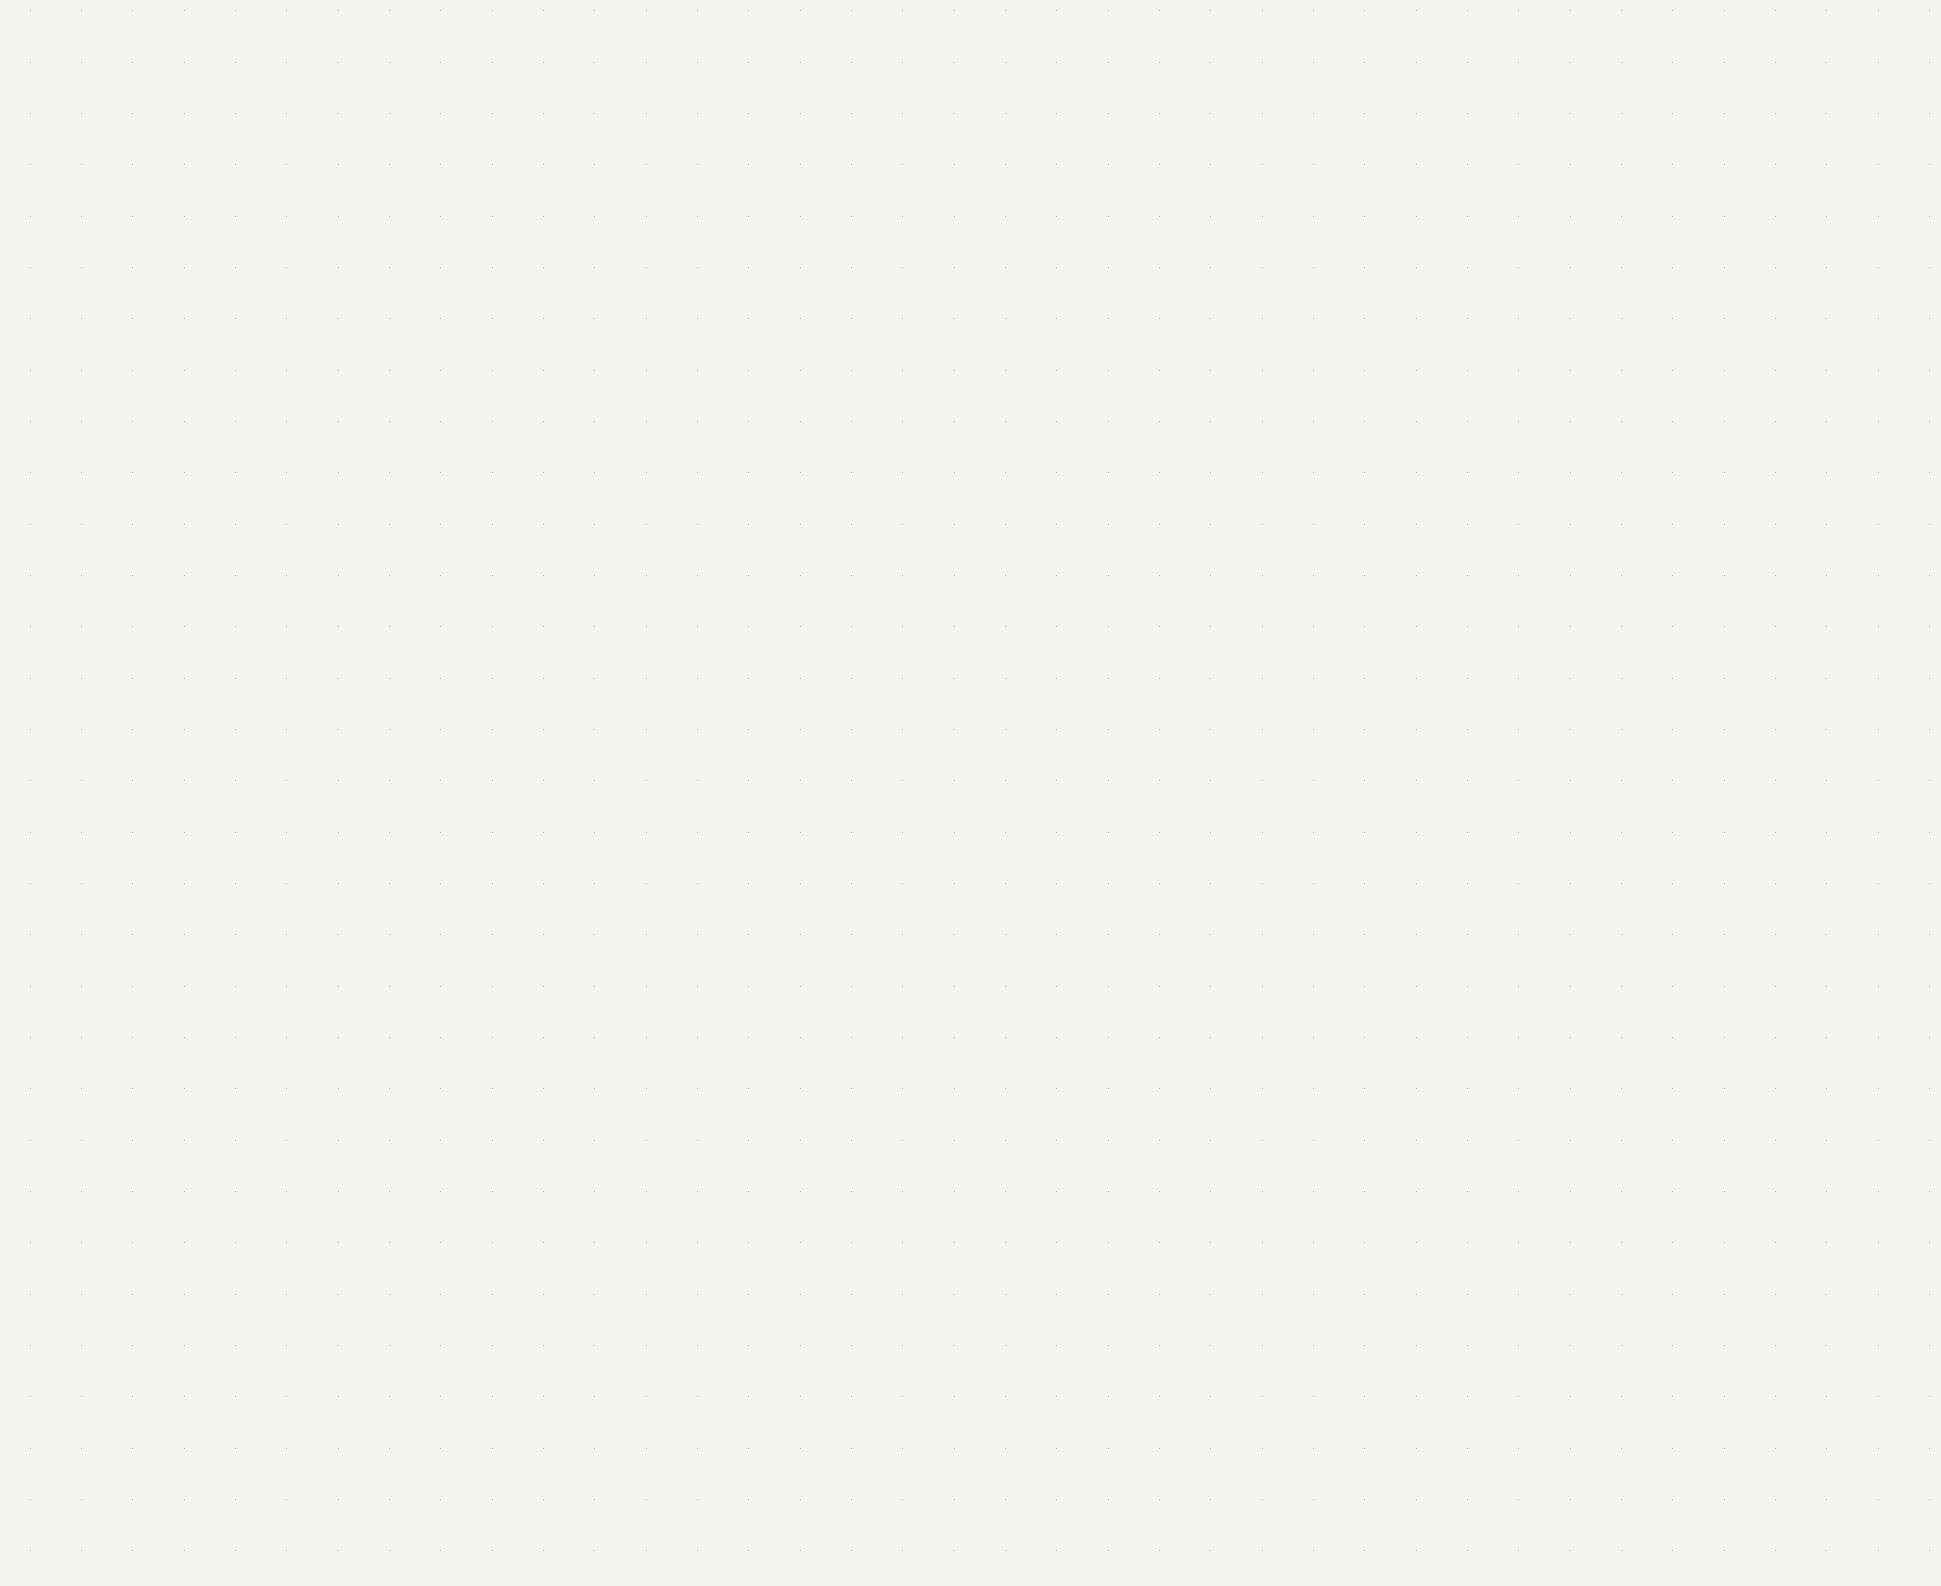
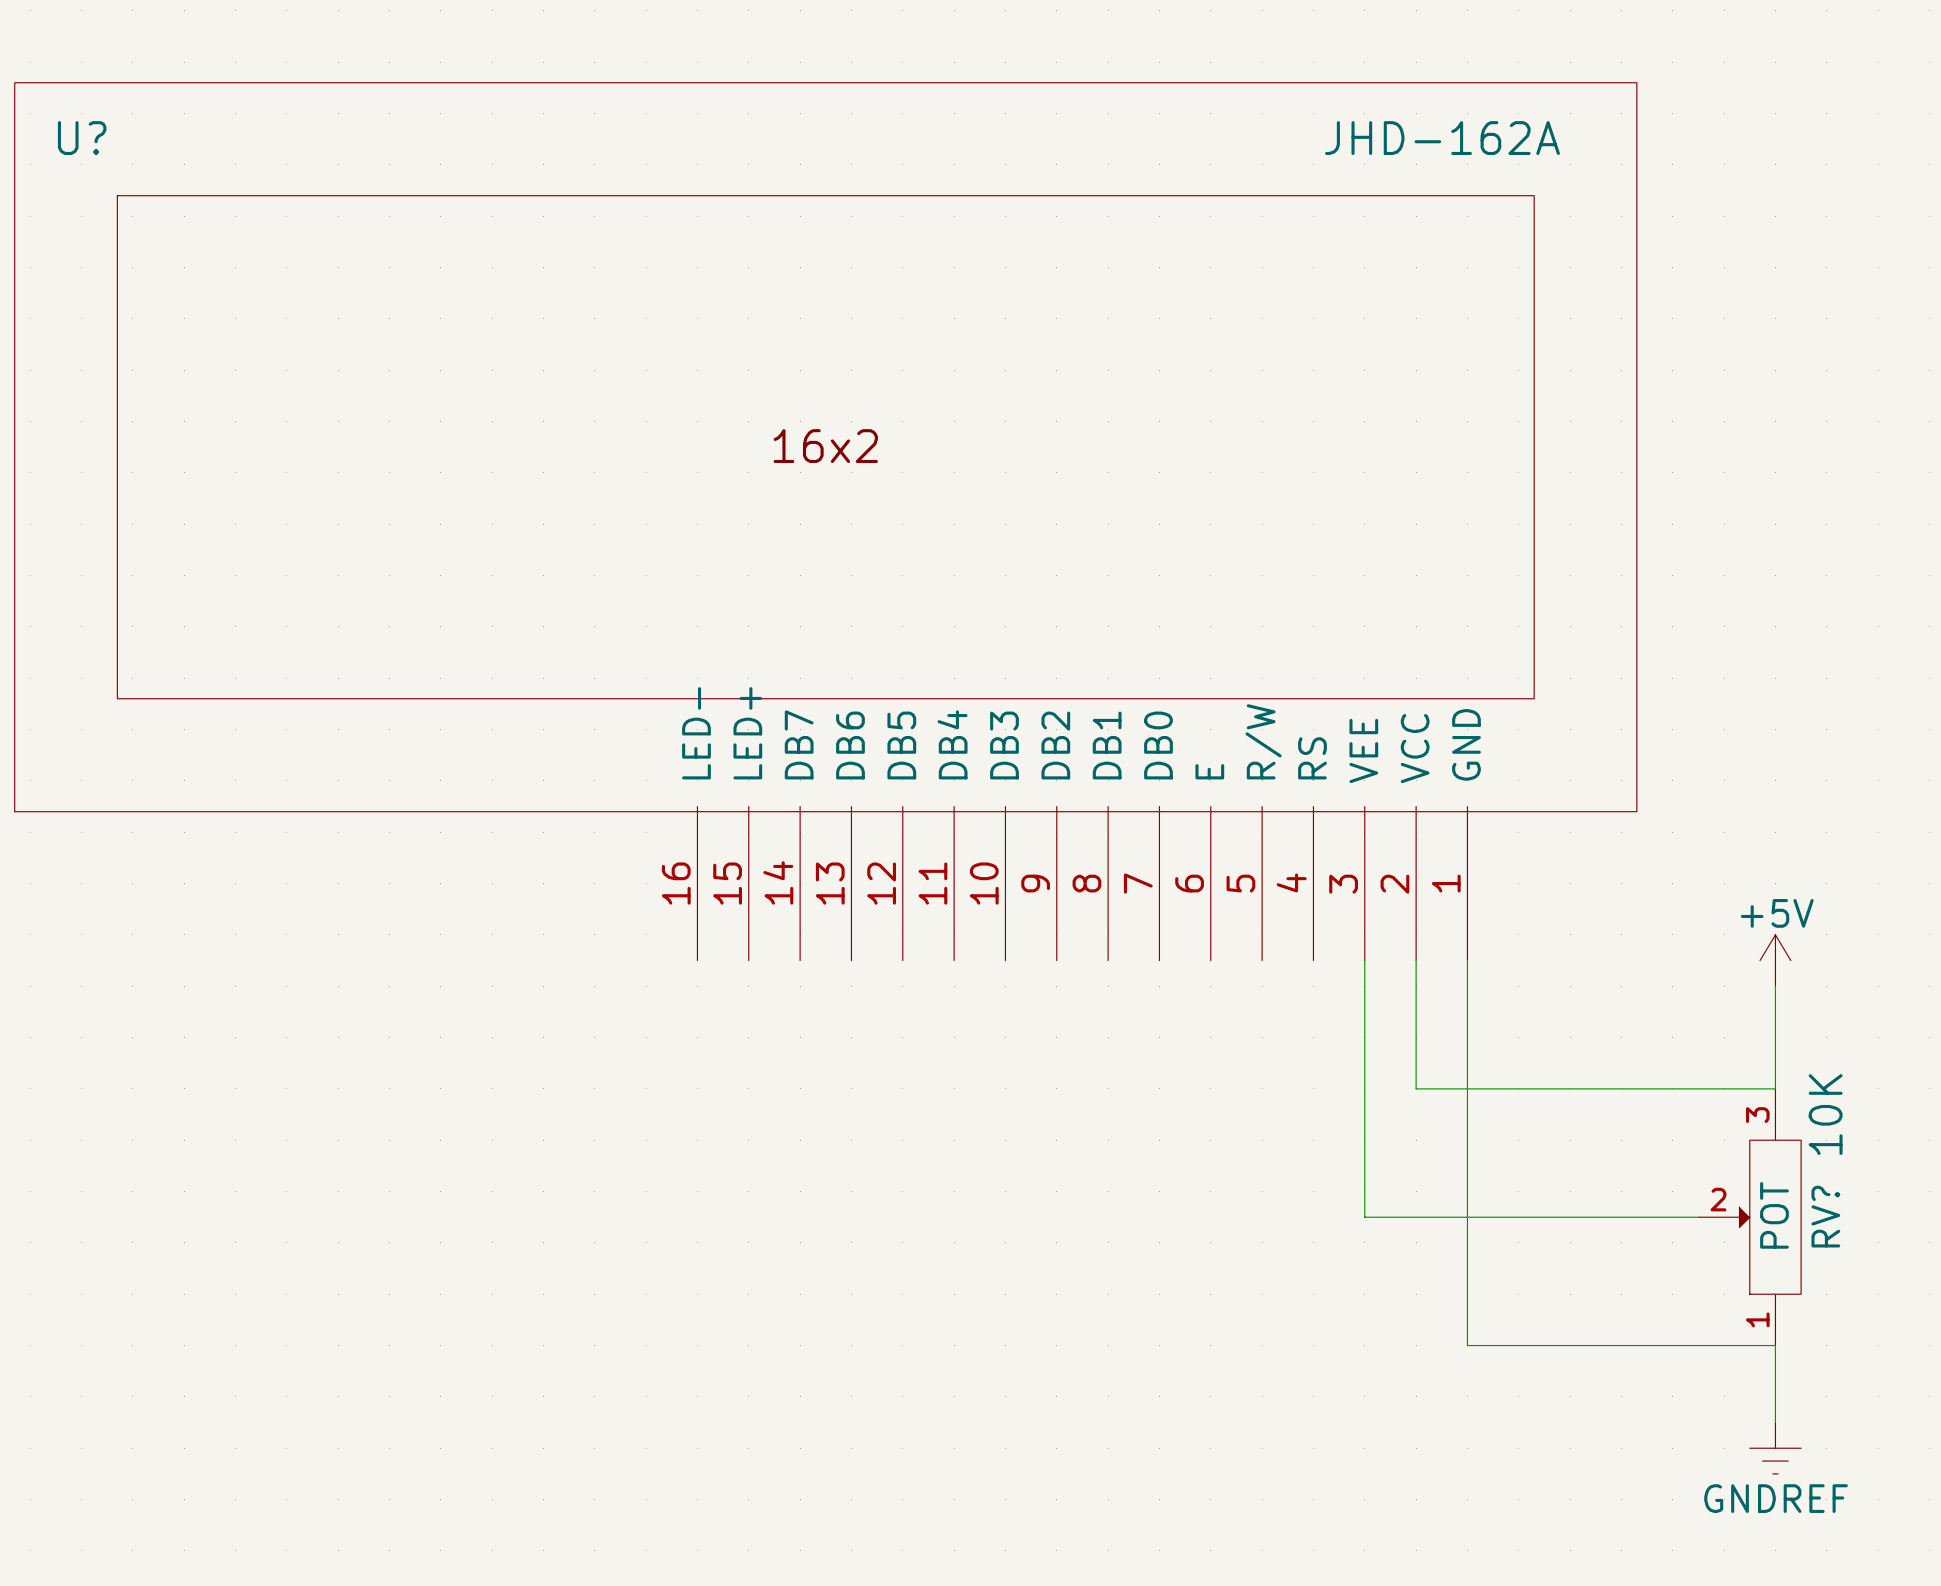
U?: none -> JHD-162A (825, 521)
wire: none -> (1364, 960) (1364, 1217) (1698, 1217)
wire: none -> (1416, 960) (1416, 1088) (1775, 1088) (1775, 986)
wire: none -> (1467, 960) (1467, 1345) (1775, 1345) (1775, 1422)
power symbol: none -> +5V (1775, 960)
RV?: none -> POT (1749, 1217)
power symbol: none -> GNDREF (1775, 1448)

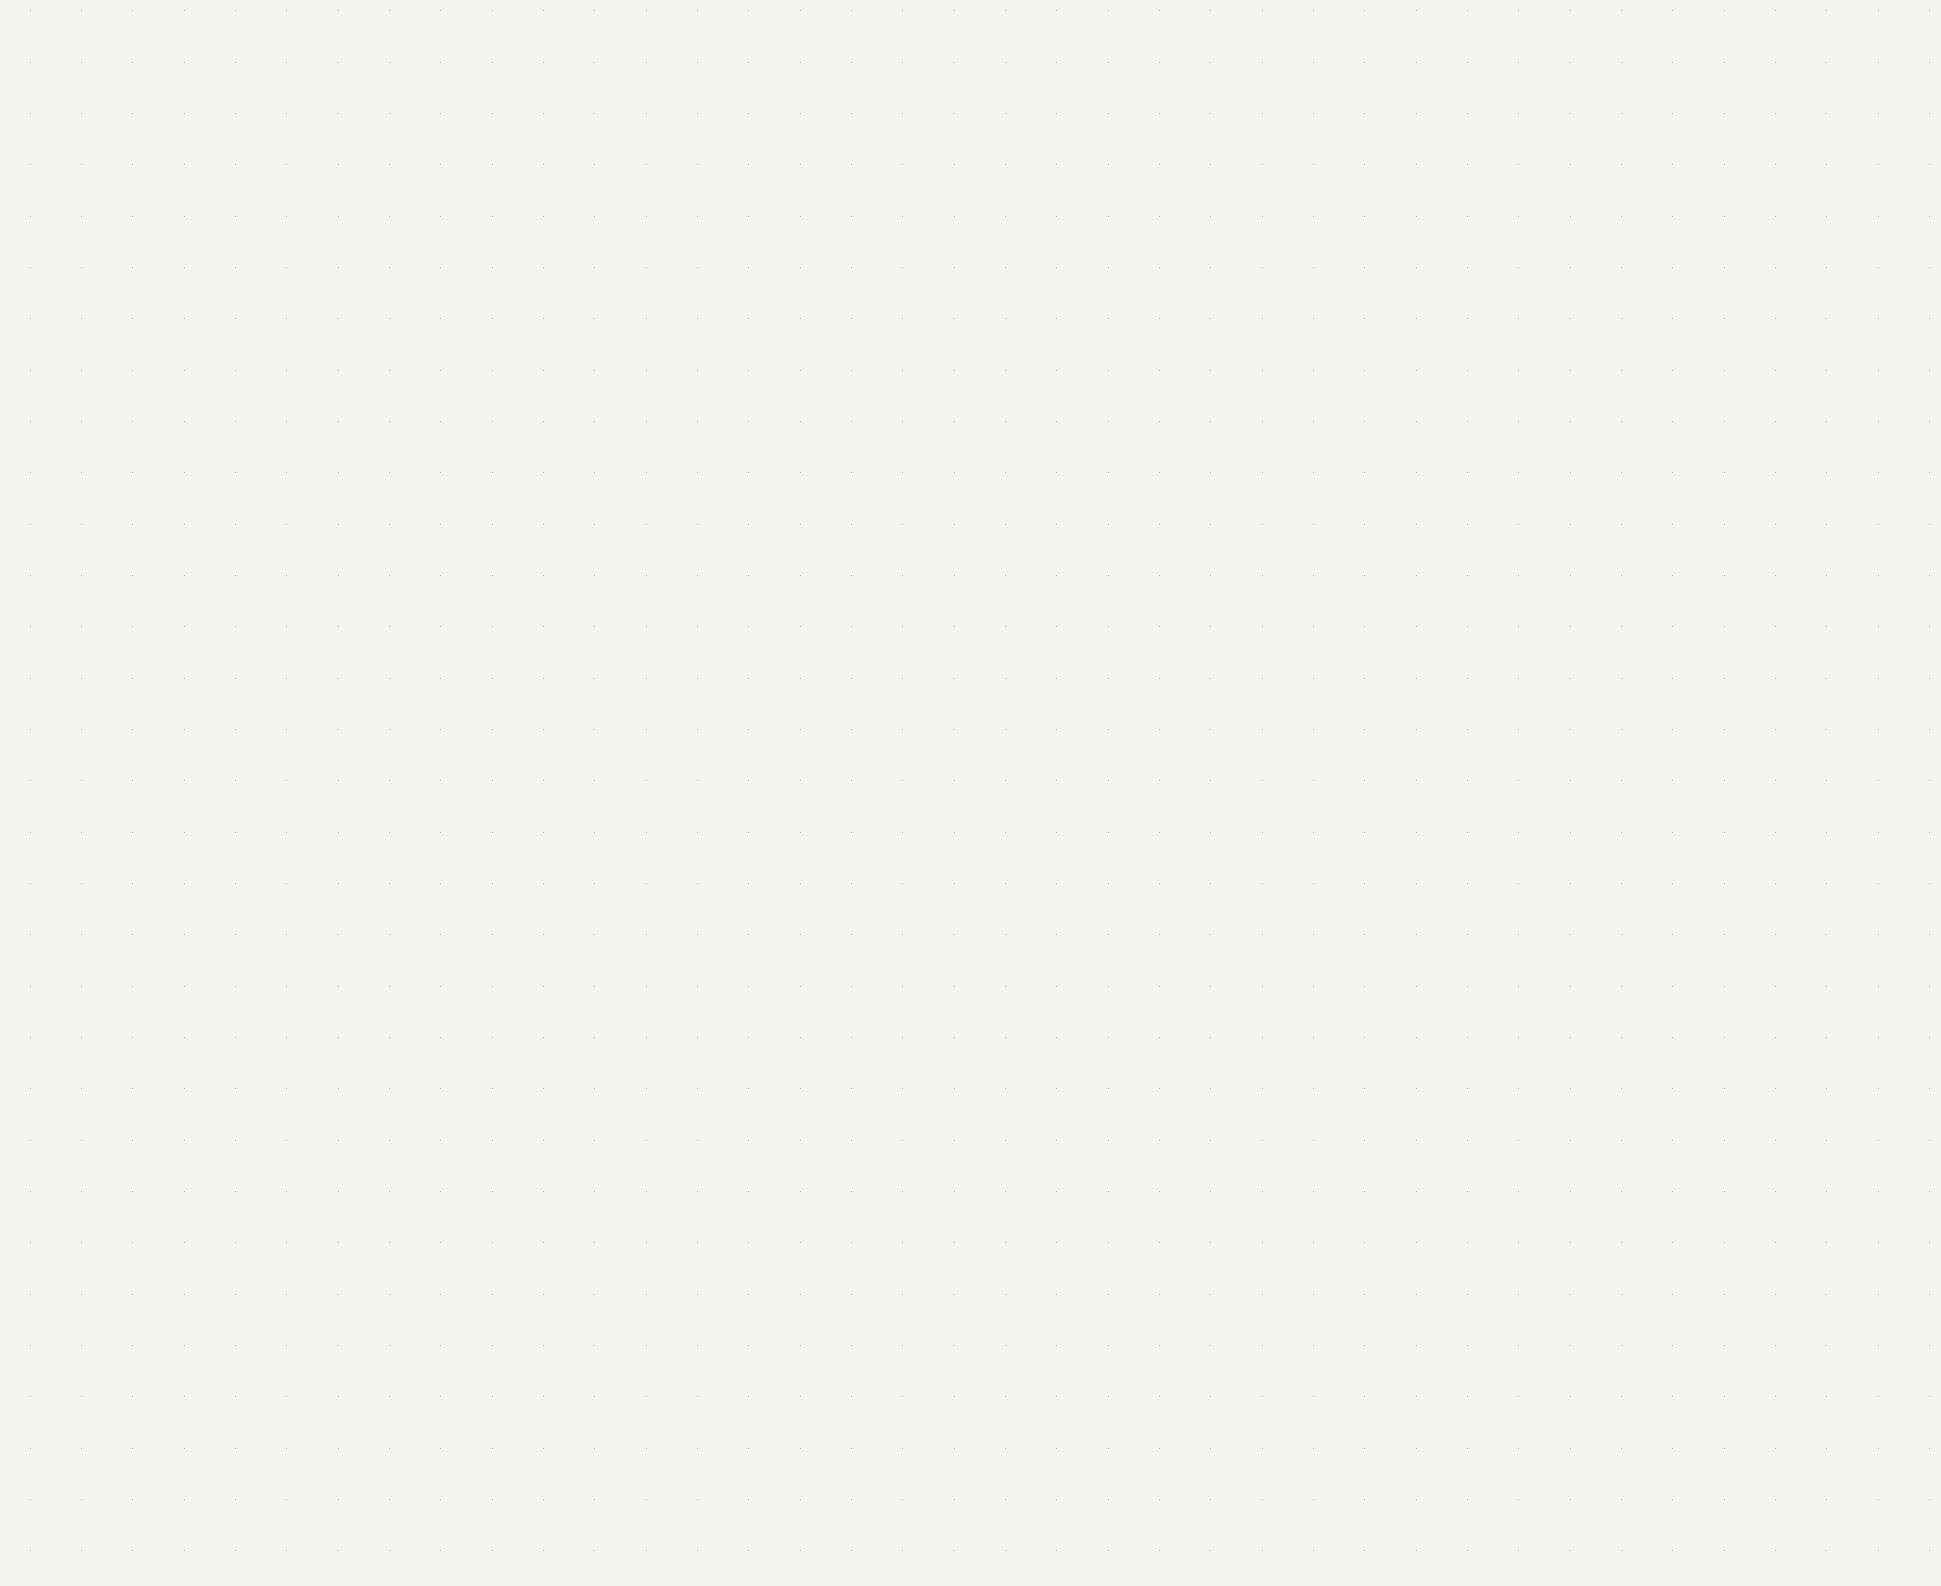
U?: JHD-162A (825, 521) -> none
wire: (1364, 960) (1364, 1217) (1698, 1217) -> none
wire: (1416, 960) (1416, 1088) (1775, 1088) (1775, 986) -> none
wire: (1467, 960) (1467, 1345) (1775, 1345) (1775, 1422) -> none
power symbol: +5V (1775, 960) -> none
RV?: POT (1749, 1217) -> none
power symbol: GNDREF (1775, 1448) -> none

